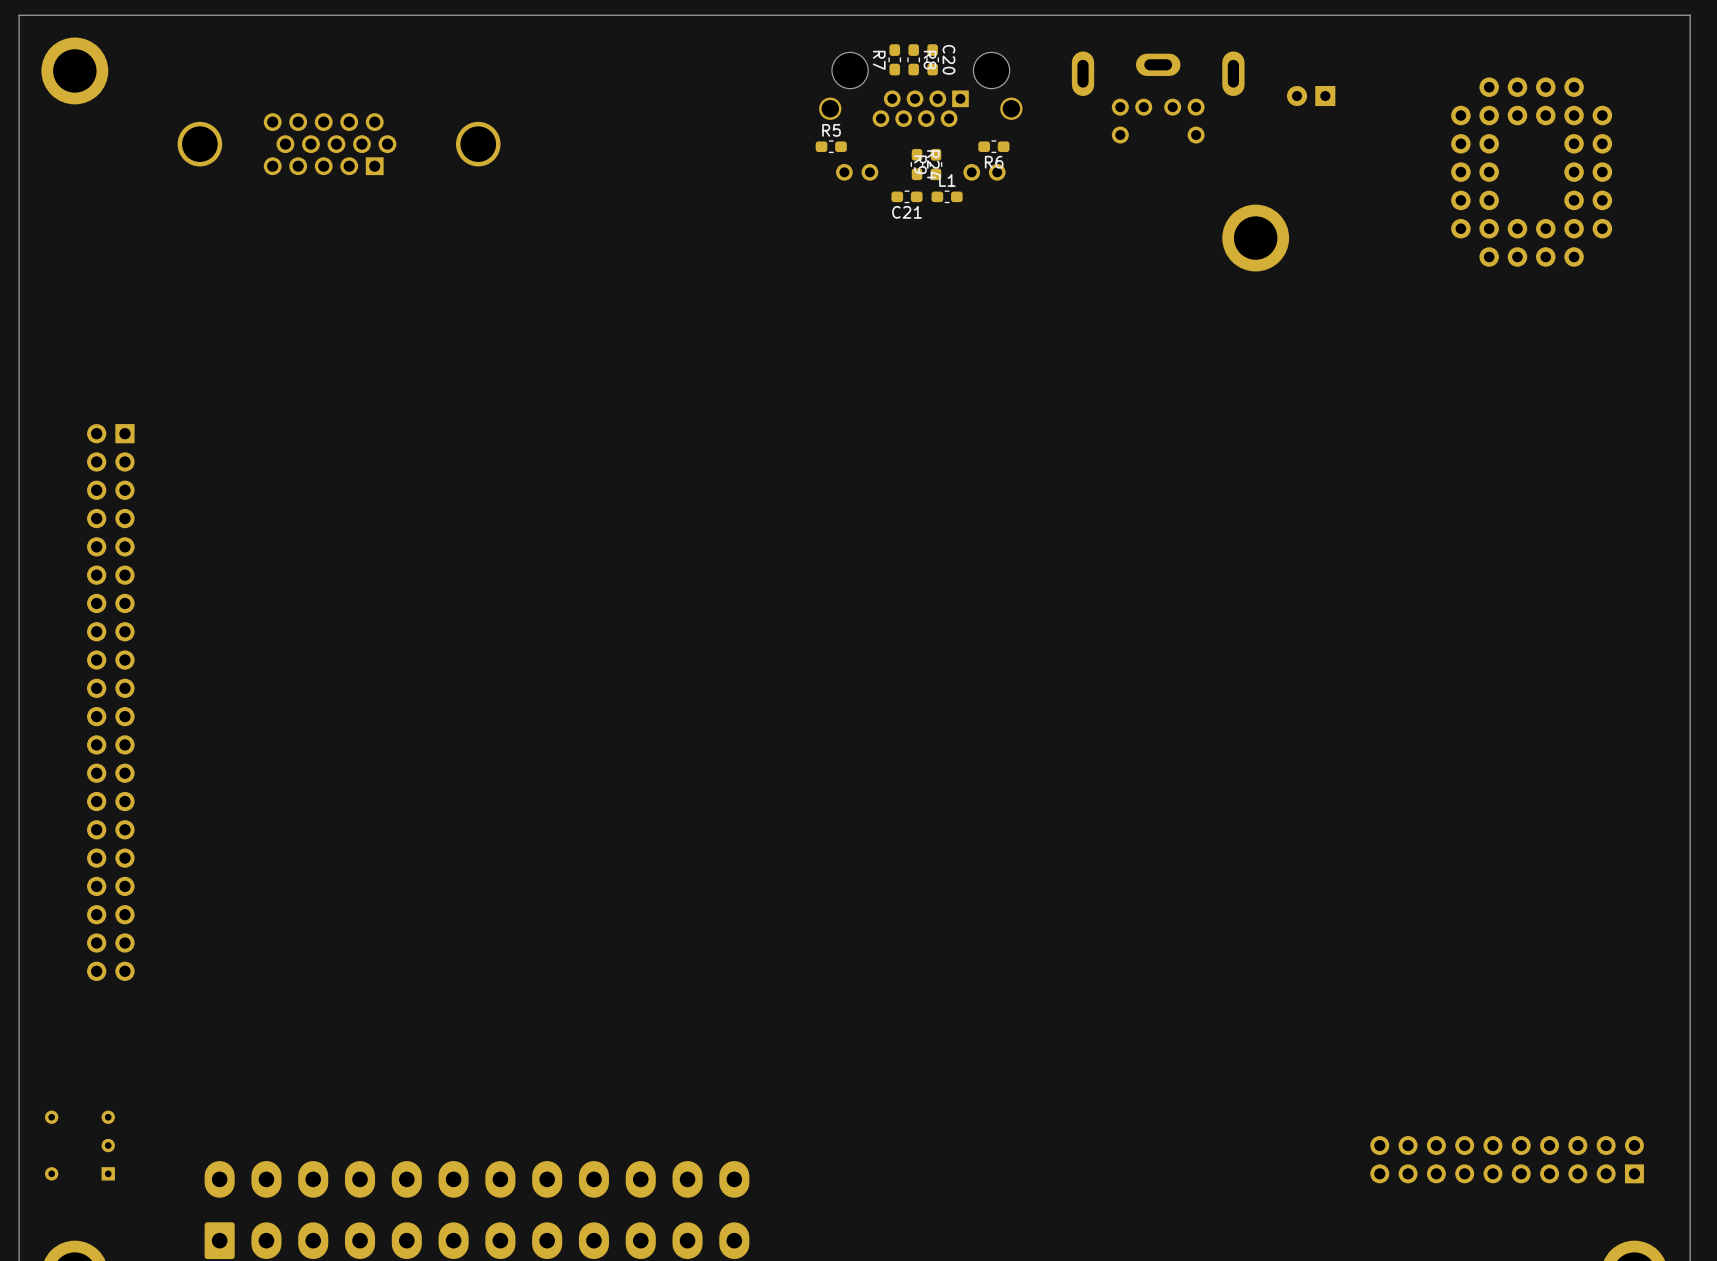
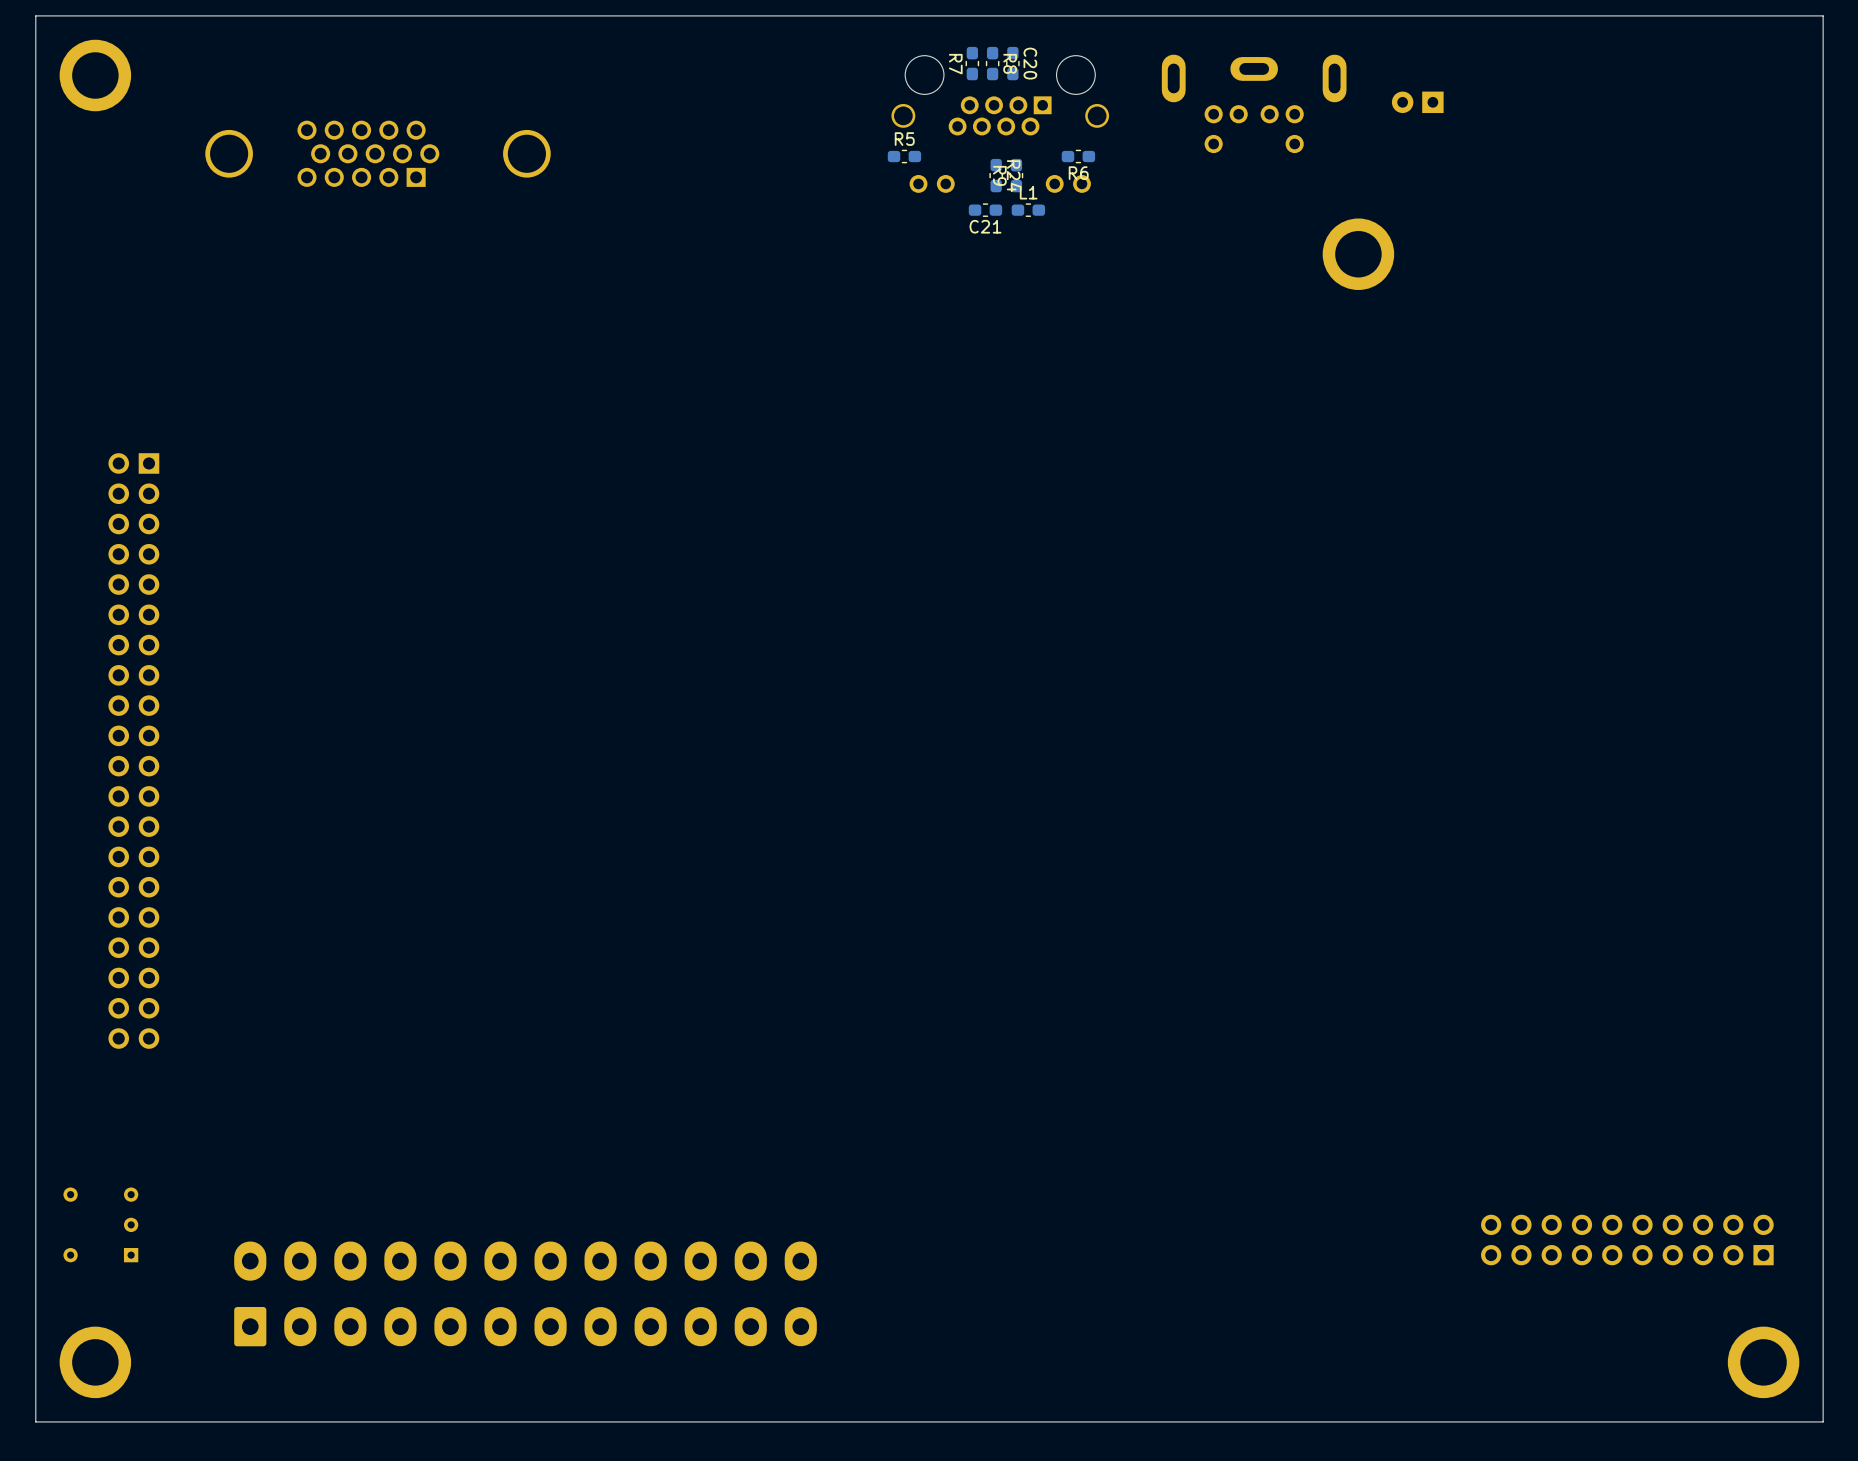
part: (1531, 172) -> none

